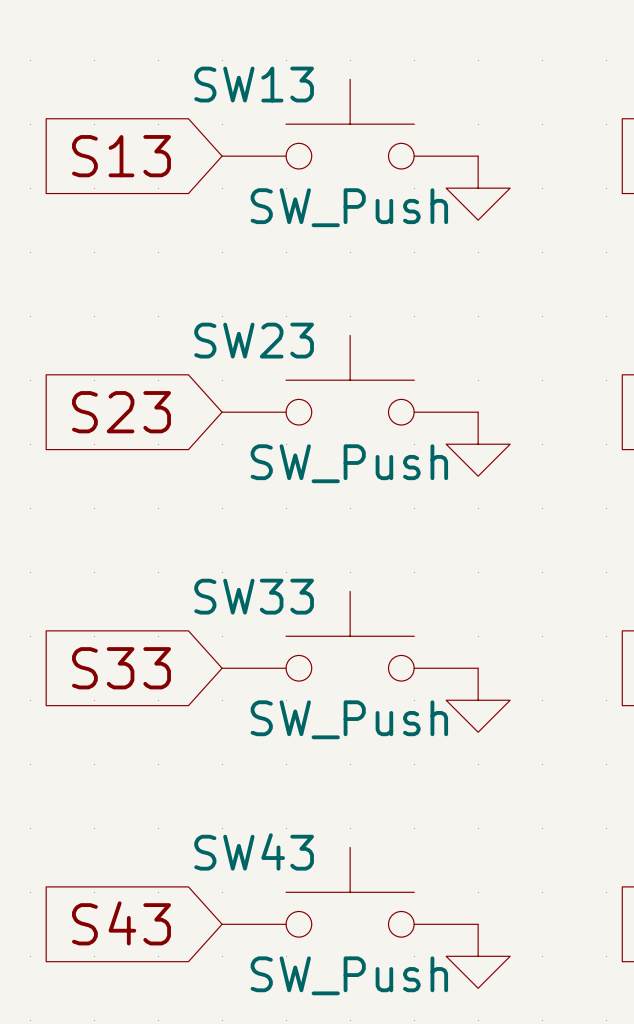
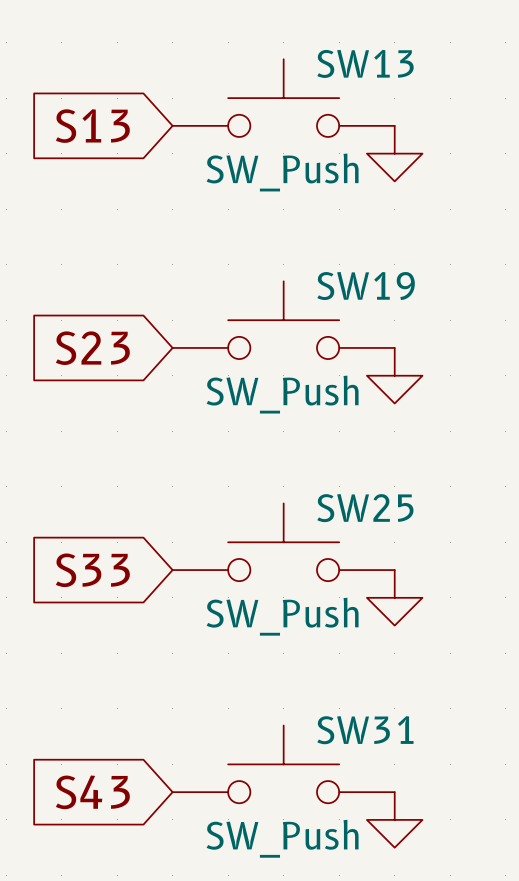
SW13 name position: SW13 (254, 84) -> SW13 (365, 63)
SW23 name: SW23 (254, 340) -> SW19 (366, 286)
SW33 name: SW33 (254, 596) -> SW25 (365, 508)
SW43 name: SW43 (254, 851) -> SW31 (365, 730)

